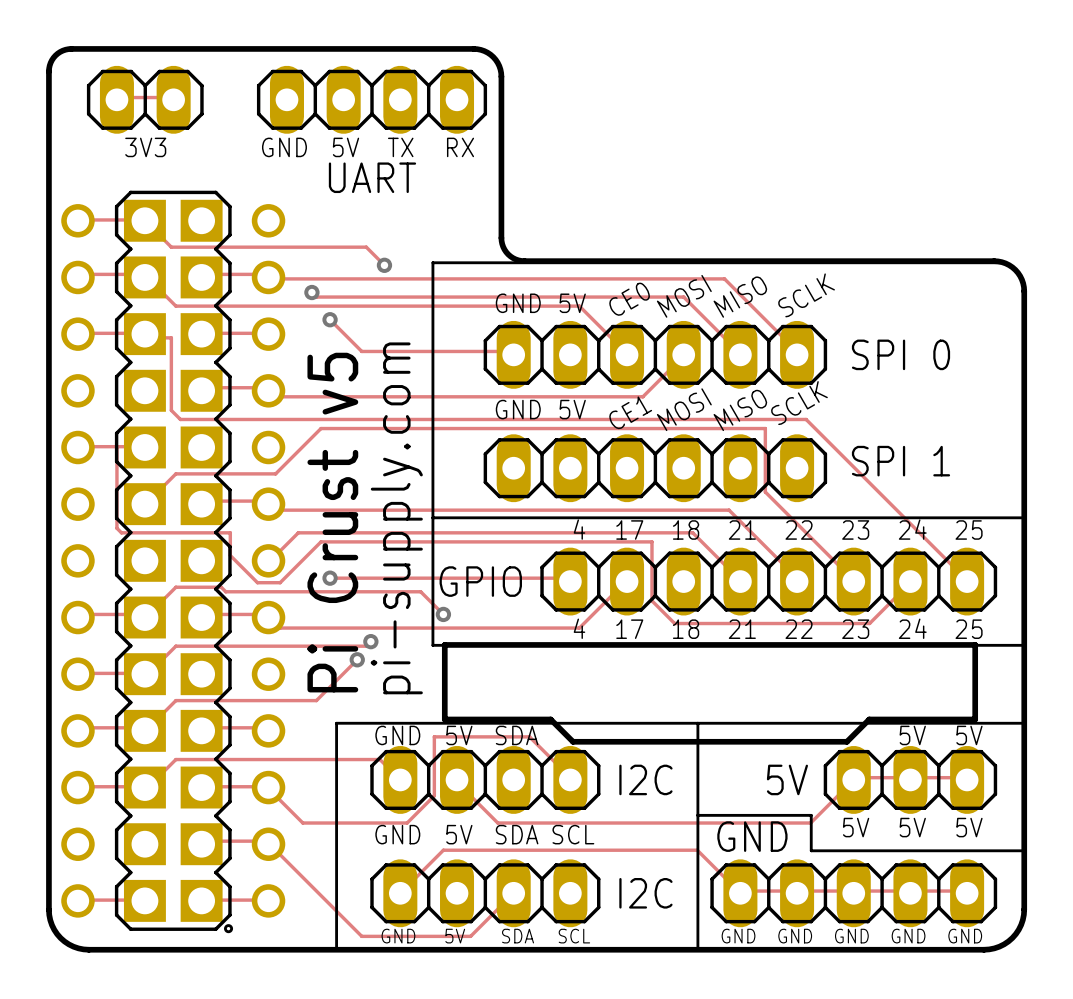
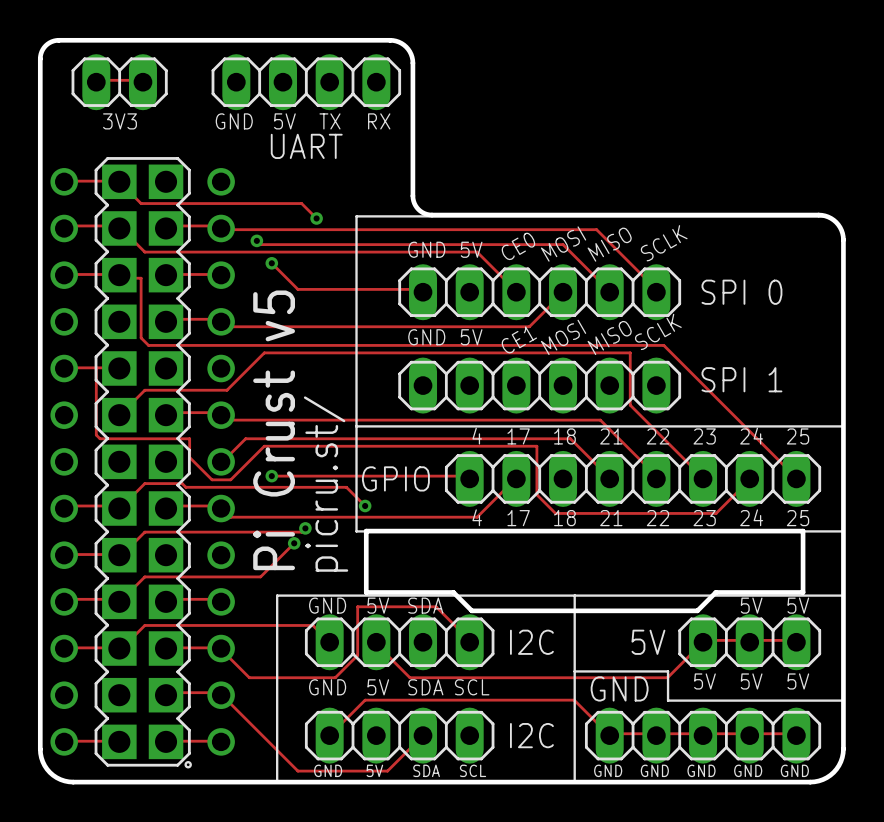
text: pi-supply.com (396, 518) -> picru.st/ (326, 484)

